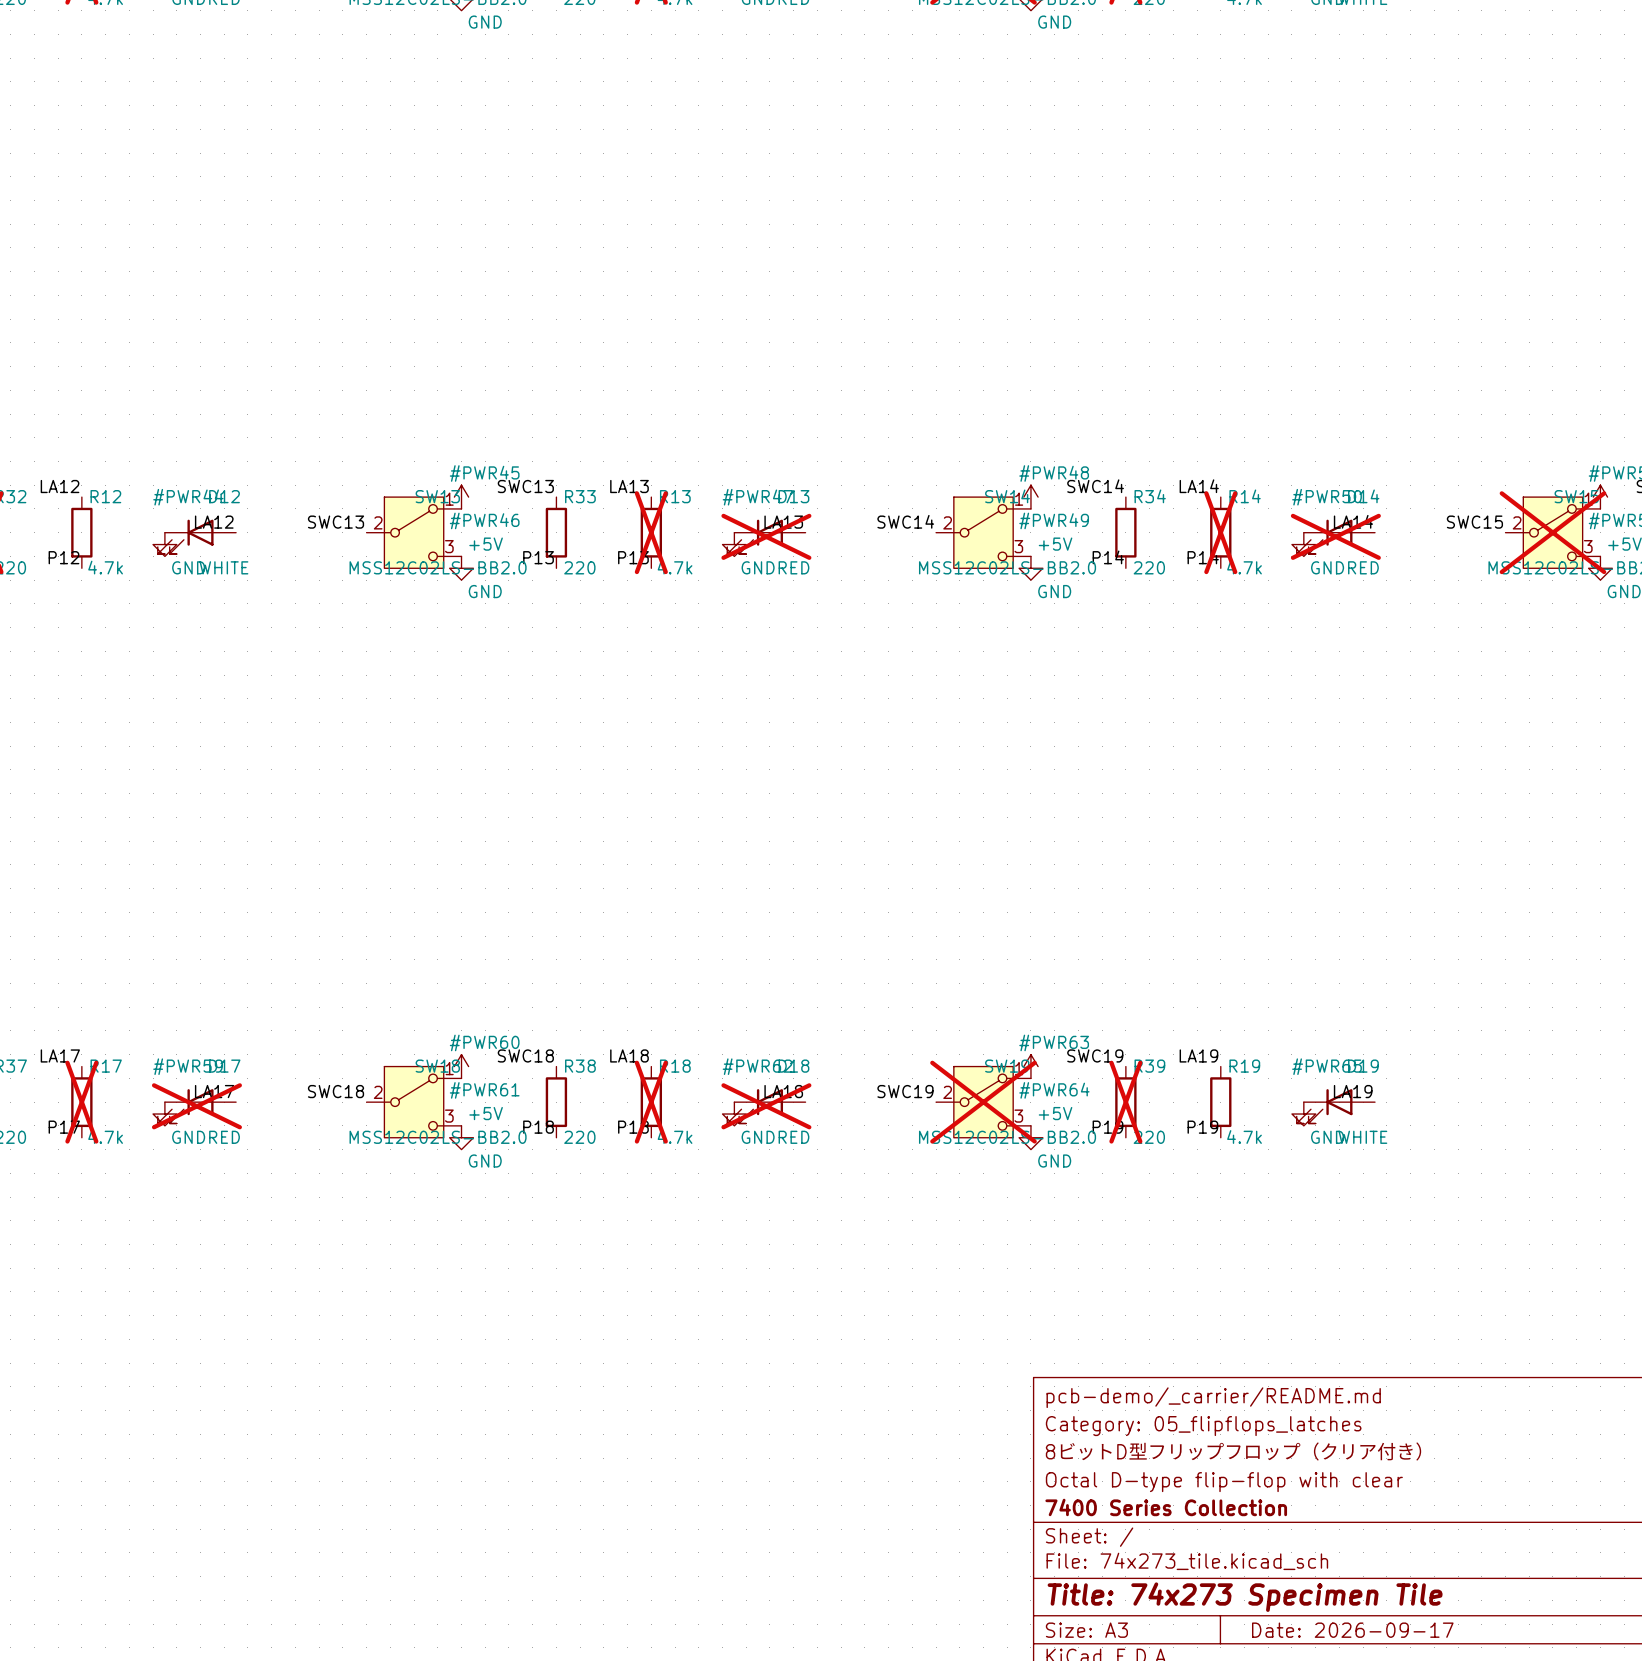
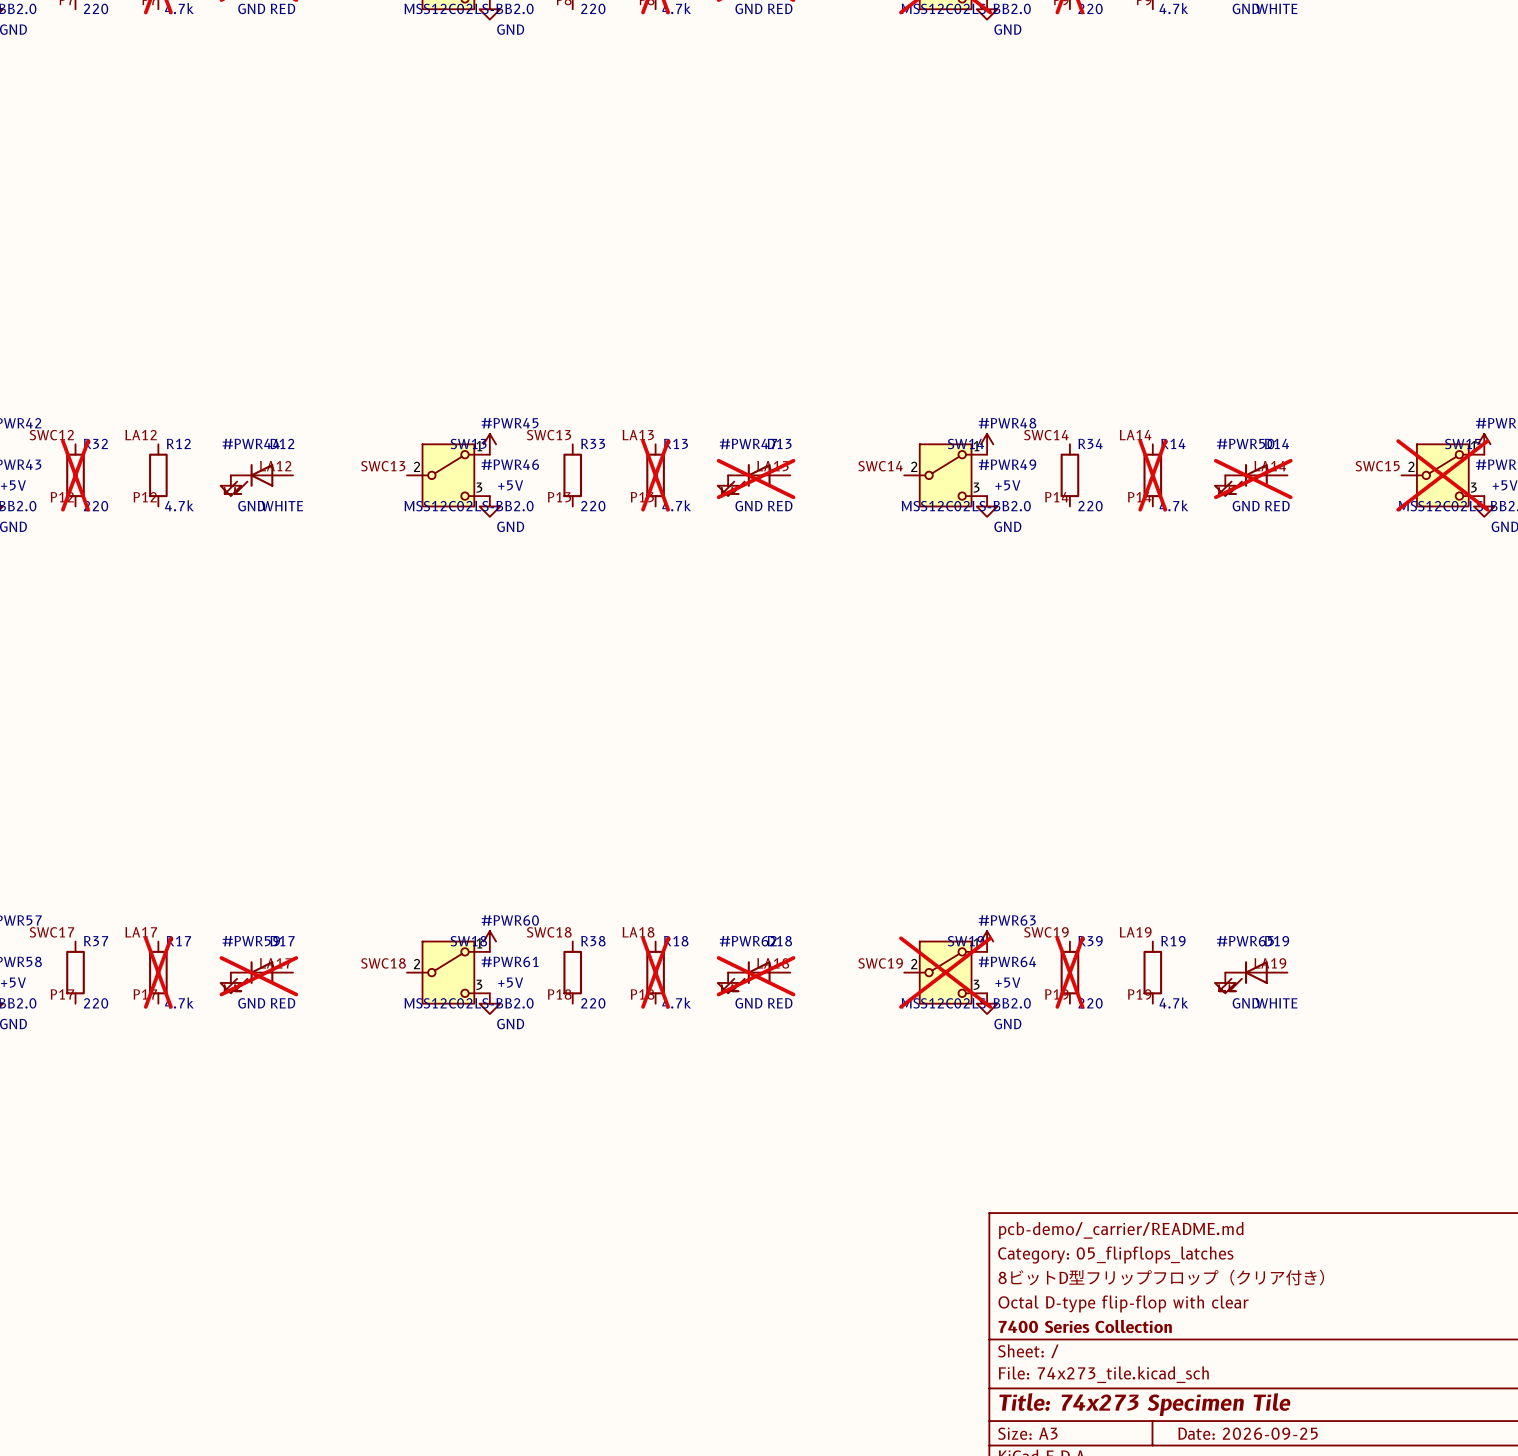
title block: Date: 2026-09-17 (1352, 1630) -> Date: 2026-09-25 (1248, 1433)

